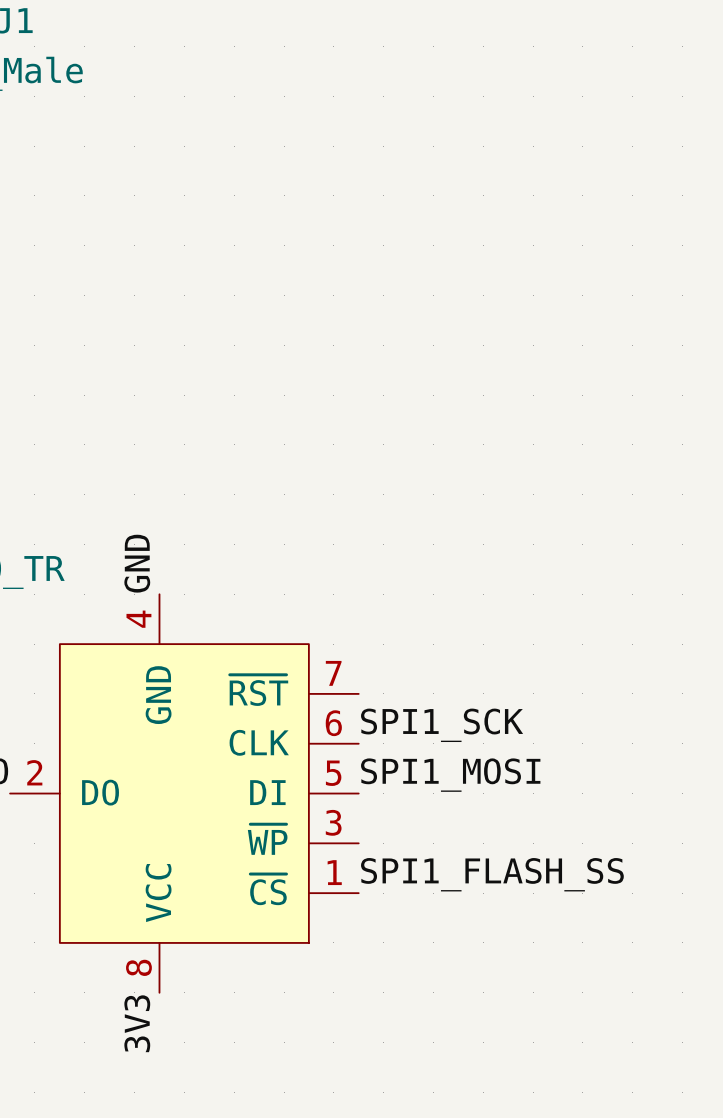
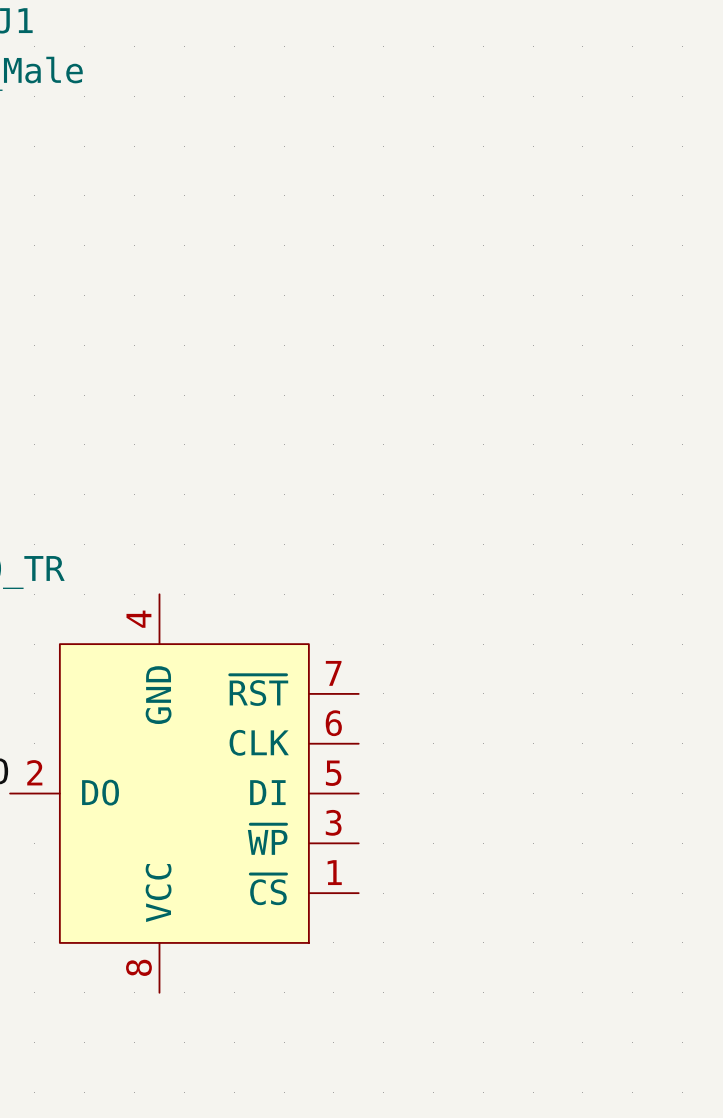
label: GND (137, 563) -> none
label: SPI1_SCK (442, 725) -> none
label: SPI1_MOSI (450, 775) -> none
label: SPI1_FLASH_SS (492, 874) -> none
label: 3V3 (137, 1023) -> none

